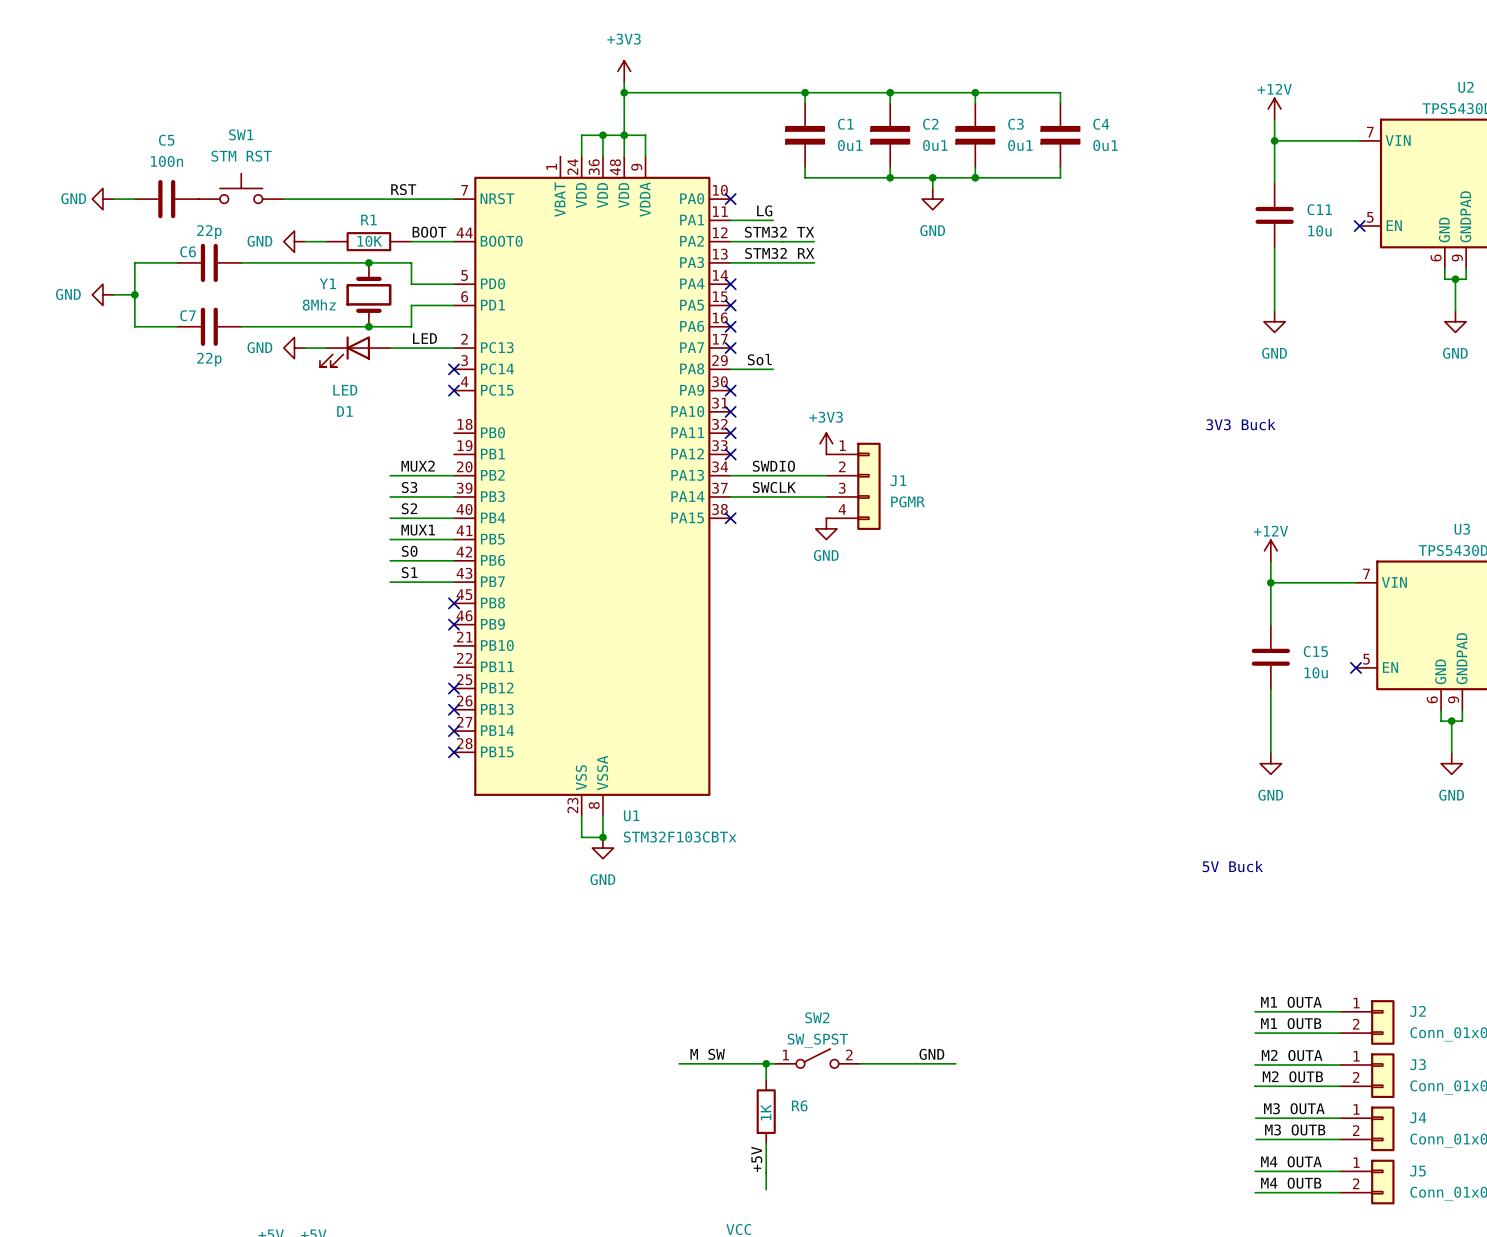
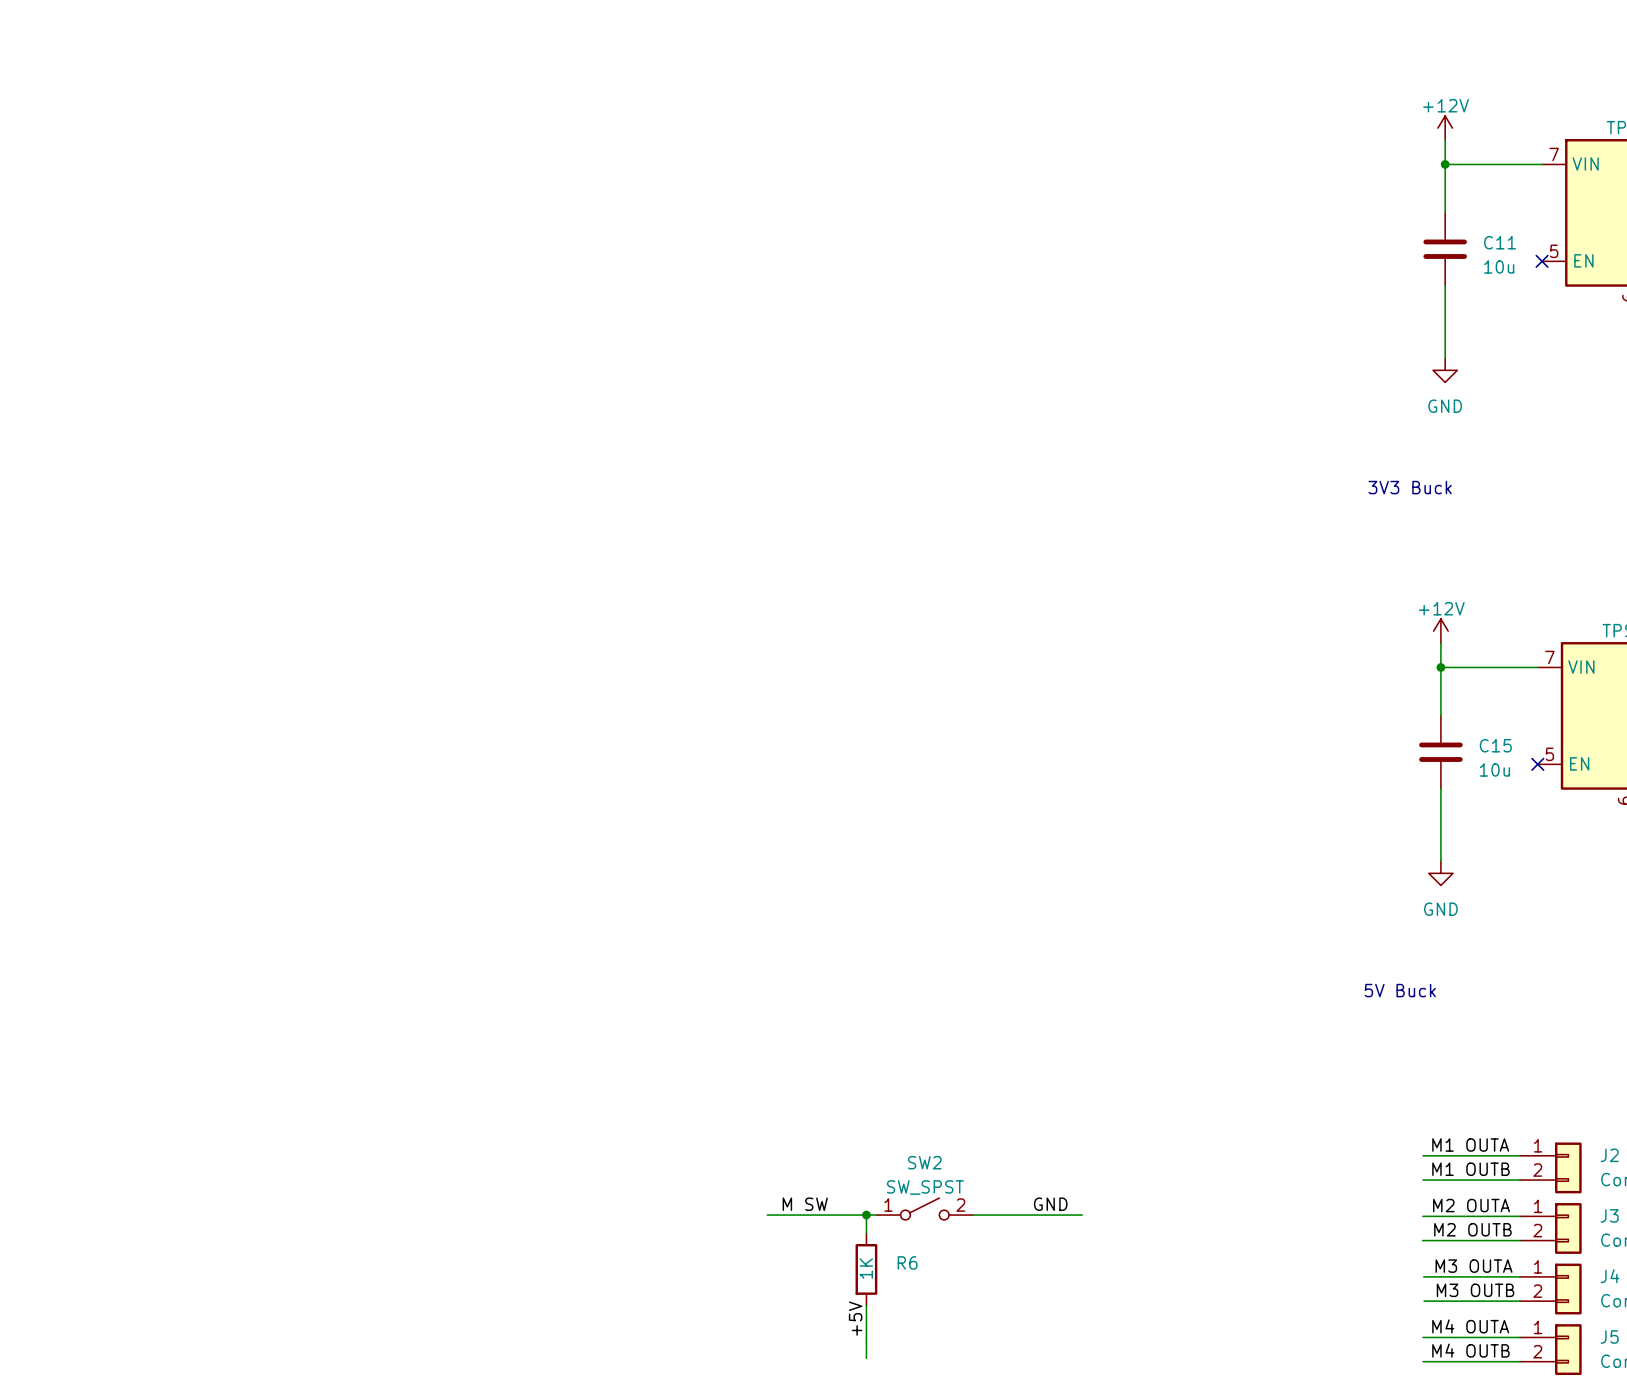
power symbol: +3V3 (624, 71) -> none
wire: (624, 82) (624, 156) -> none
wire: (624, 92) (1060, 92) (1060, 103) -> none
junction: (624, 92) -> none
wire: (805, 92) (805, 103) -> none
junction: (805, 92) -> none
wire: (890, 92) (890, 103) -> none
junction: (890, 92) -> none
wire: (975, 92) (975, 103) -> none
junction: (975, 92) -> none
wire: (602, 135) (602, 156) -> none
junction: (602, 135) -> none
junction: (624, 135) -> none
C1: 0u1 (805, 135) -> none
C2: 0u1 (890, 135) -> none
C3: 0u1 (975, 135) -> none
C4: 0u1 (1060, 135) -> none
wire: (581, 156) (581, 135) (645, 135) (645, 156) -> none
wire: (805, 167) (805, 177) (1060, 177) (1060, 167) -> none
wire: (890, 167) (890, 177) -> none
wire: (975, 167) (975, 177) -> none
junction: (890, 177) -> none
wire: (932, 177) (932, 188) -> none
junction: (932, 177) -> none
junction: (975, 177) -> none
SW1: STM RST (241, 188) -> none
label: RST (403, 189) -> none
power symbol: GND (102, 199) -> none
wire: (113, 199) (134, 199) -> none
C5: 100n (166, 199) -> none
wire: (283, 199) (454, 199) -> none
no-connect mark: (730, 199) -> none
power symbol: GND (932, 199) -> none
label: LG (764, 210) -> none
wire: (730, 220) (773, 220) -> none
label: BOOT (429, 232) -> none
label: STM32 TX (779, 232) -> none
power symbol: GND (294, 241) -> none
wire: (305, 241) (326, 241) -> none
R1: 10K (368, 241) -> none
wire: (411, 241) (454, 241) -> none
wire: (730, 241) (782, 241) -> none
wire: (782, 241) (814, 241) -> none
label: STM32 RX (779, 253) -> none
wire: (177, 262) (134, 262) (134, 326) (177, 326) -> none
C6: 22p (209, 262) -> none
wire: (241, 262) (411, 262) (411, 284) (454, 284) -> none
junction: (368, 262) -> none
wire: (730, 262) (814, 262) -> none
no-connect mark: (730, 284) -> none
power symbol: GND (102, 294) -> none
wire: (113, 294) (134, 294) -> none
junction: (134, 294) -> none
Y1: 8Mhz (368, 294) -> none
wire: (454, 305) (411, 305) (411, 326) (241, 326) -> none
no-connect mark: (730, 305) -> none
C7: 22p (209, 326) -> none
junction: (368, 326) -> none
no-connect mark: (730, 326) -> none
label: LED (424, 338) -> none
power symbol: GND (294, 348) -> none
wire: (305, 348) (326, 348) -> none
wire: (390, 348) (454, 348) -> none
no-connect mark: (730, 348) -> none
D1: LED (355, 351) -> none
label: Sol (759, 359) -> none
no-connect mark: (454, 369) -> none
wire: (730, 369) (773, 369) -> none
no-connect mark: (454, 390) -> none
no-connect mark: (730, 390) -> none
no-connect mark: (730, 411) -> none
no-connect mark: (730, 433) -> none
power symbol: +3V3 (826, 443) -> none
no-connect mark: (730, 454) -> none
label: MUX2 (418, 466) -> none
label: SWDIO (773, 466) -> none
wire: (390, 475) (454, 475) -> none
wire: (730, 475) (826, 475) -> none
U1: STM32F103CBTx (592, 486) -> none
J1: PGMR (853, 486) -> none
label: S3 (409, 487) -> none
label: SWCLK (774, 487) -> none
wire: (390, 496) (454, 496) -> none
wire: (730, 496) (826, 496) -> none
label: S2 (409, 508) -> none
wire: (390, 518) (454, 518) -> none
no-connect mark: (730, 518) -> none
power symbol: GND (826, 528) -> none
label: MUX1 (418, 530) -> none
wire: (390, 539) (454, 539) -> none
label: S0 (409, 551) -> none
wire: (390, 560) (454, 560) -> none
label: S1 (409, 572) -> none
wire: (390, 582) (454, 582) -> none
no-connect mark: (454, 603) -> none
no-connect mark: (454, 624) -> none
no-connect mark: (454, 688) -> none
no-connect mark: (454, 709) -> none
no-connect mark: (454, 731) -> none
no-connect mark: (454, 752) -> none
wire: (581, 816) (581, 837) (602, 837) (602, 816) -> none
junction: (602, 837) -> none
power symbol: GND (602, 848) -> none

